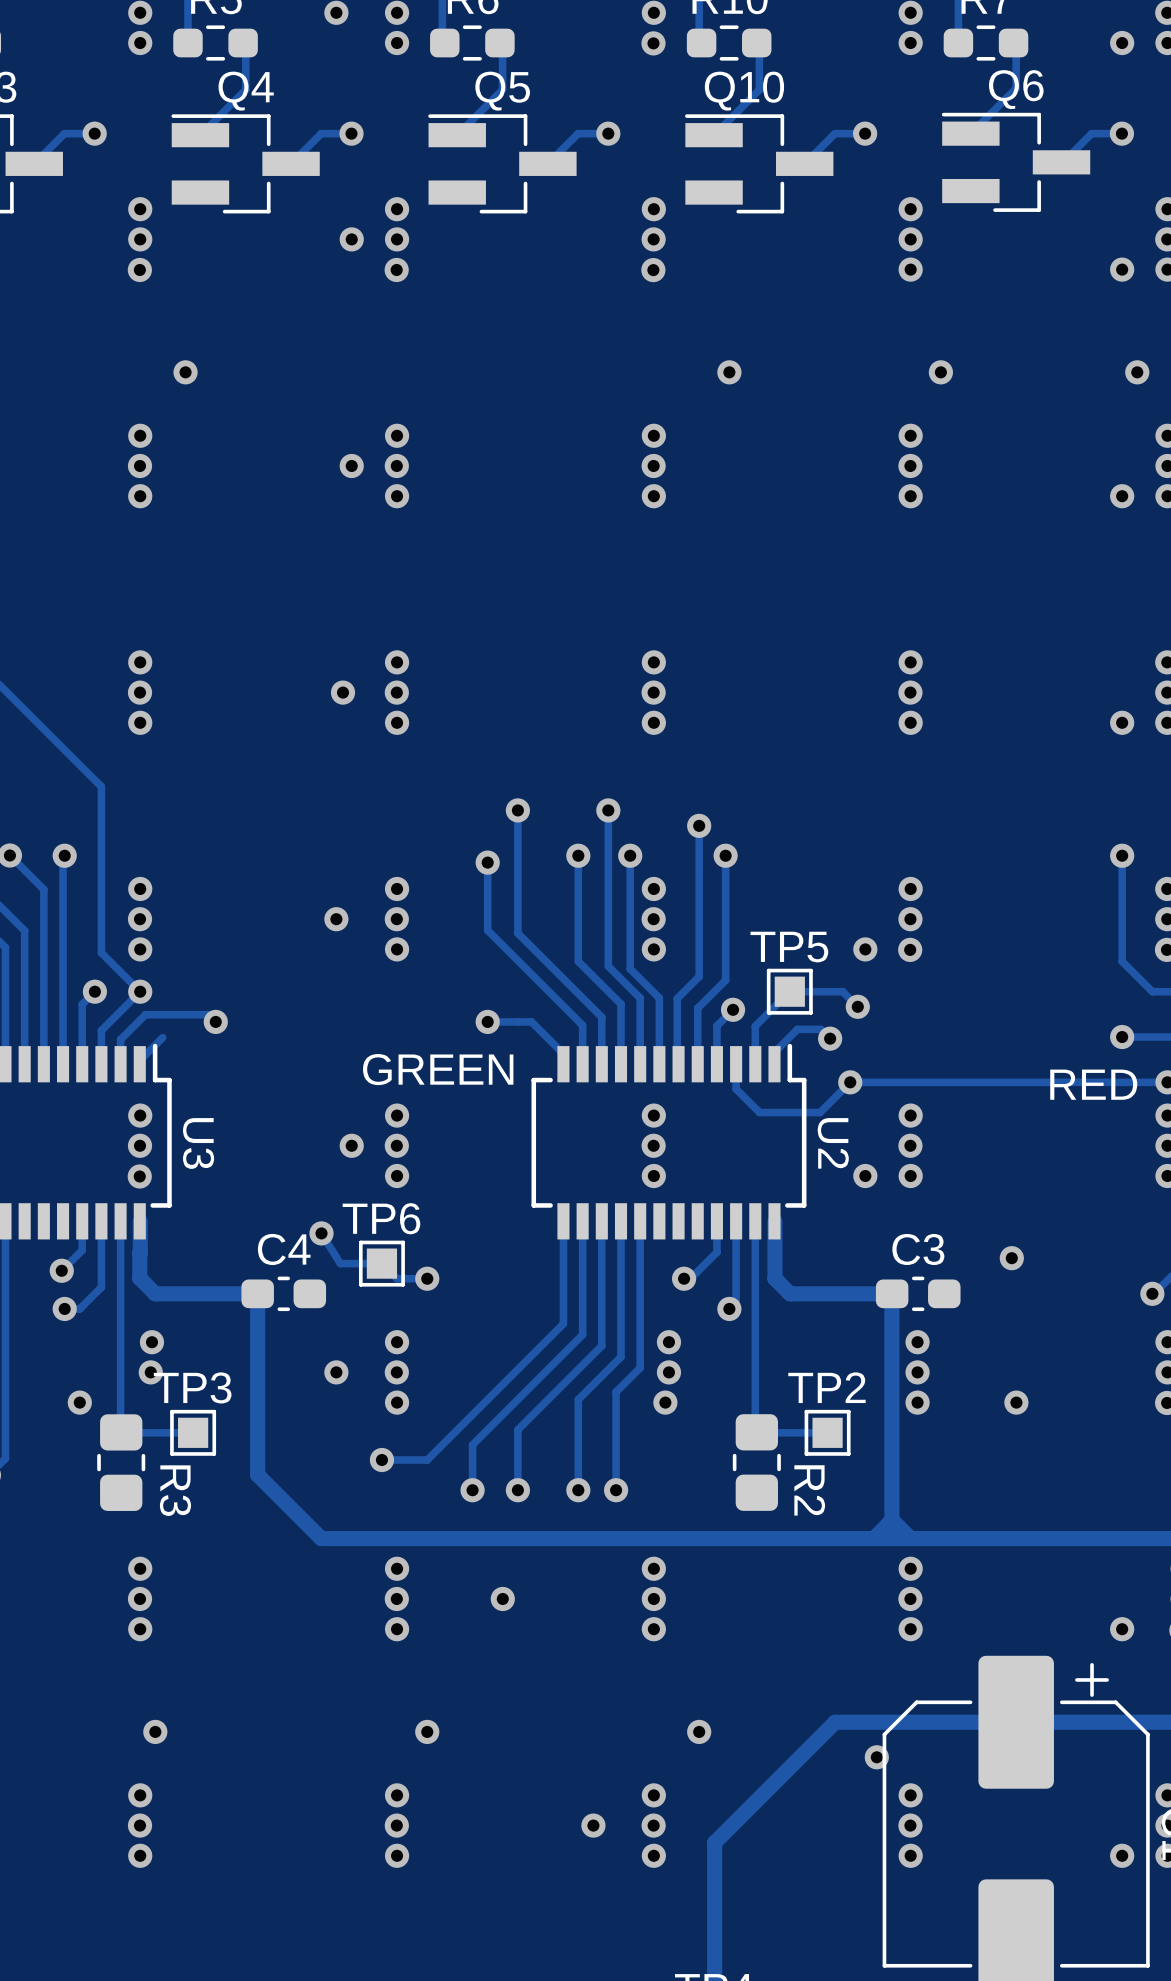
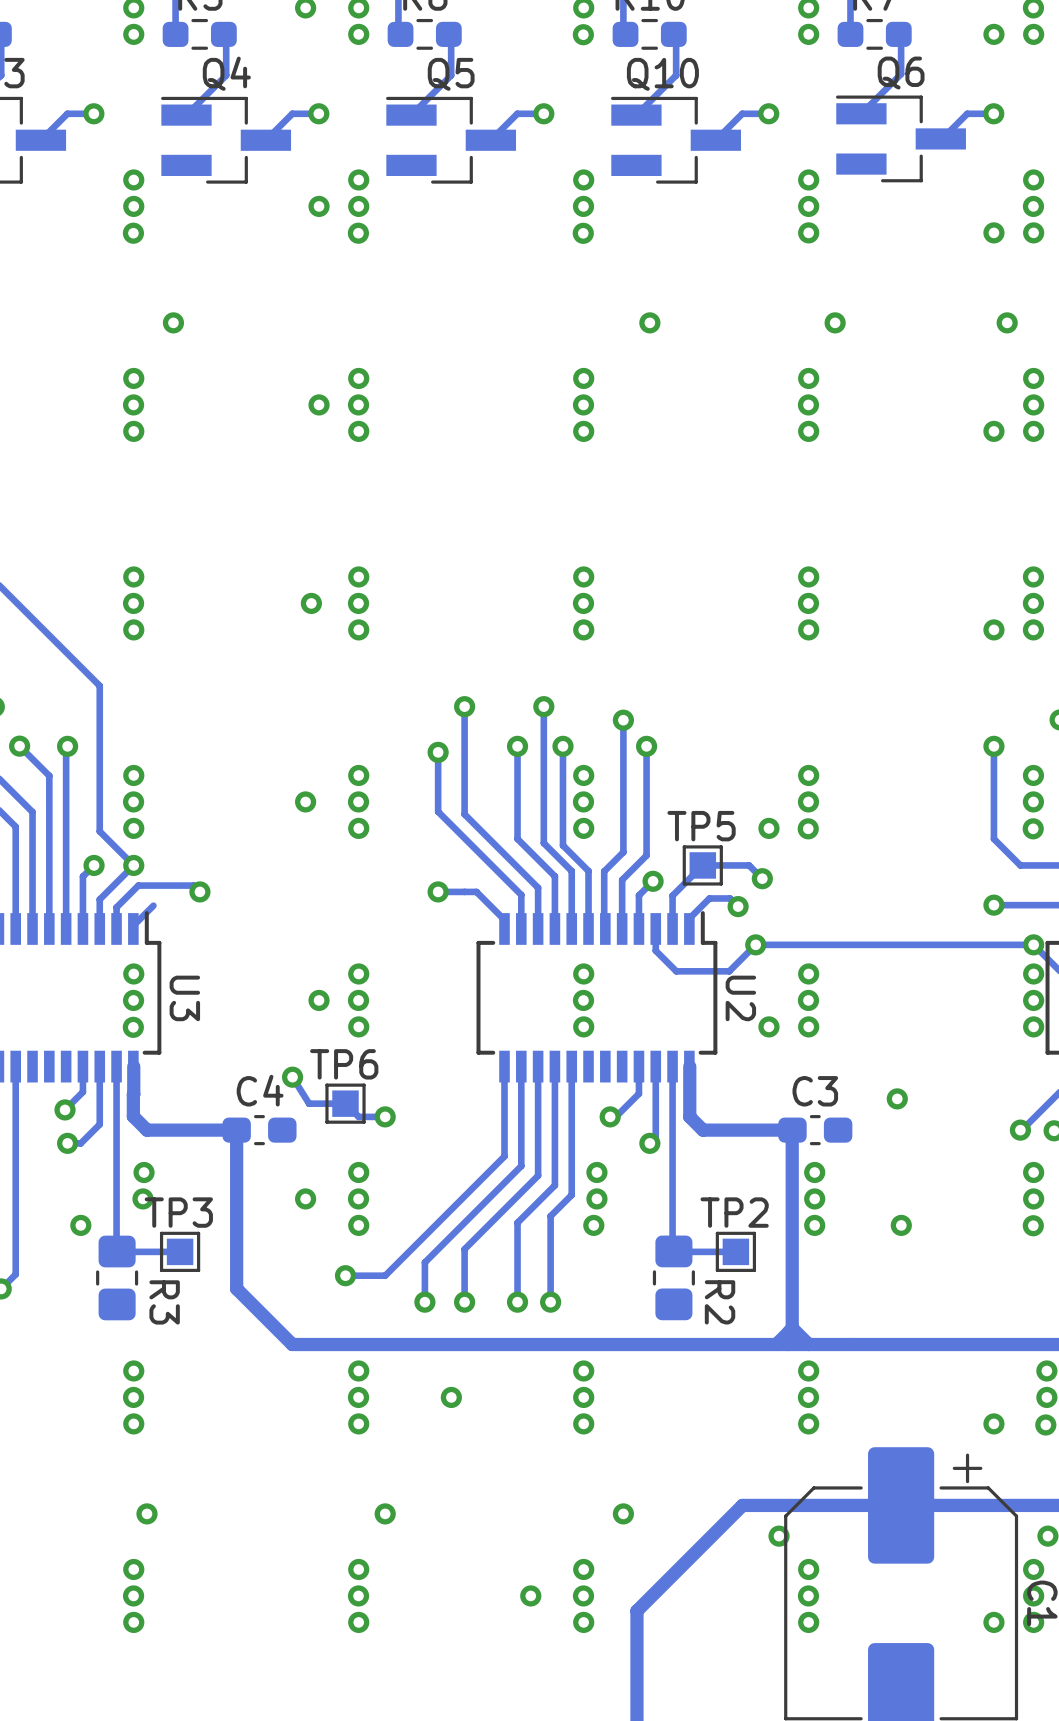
text: GREEN (438, 1069) -> none
text: RED (1093, 1084) -> none

